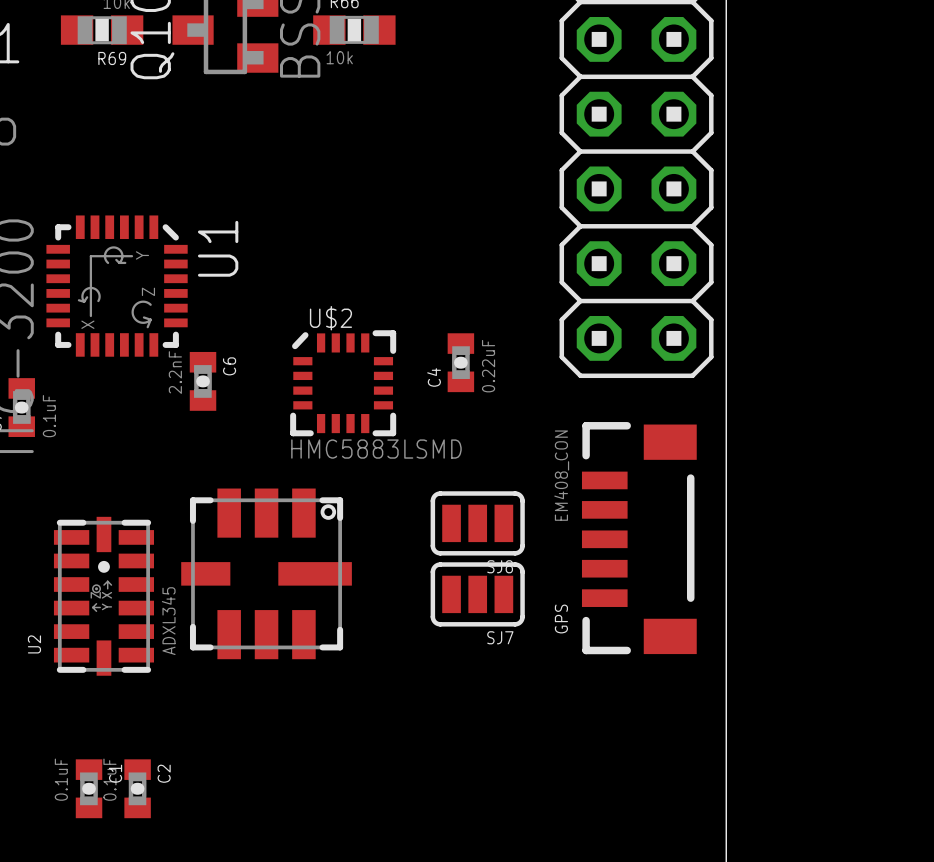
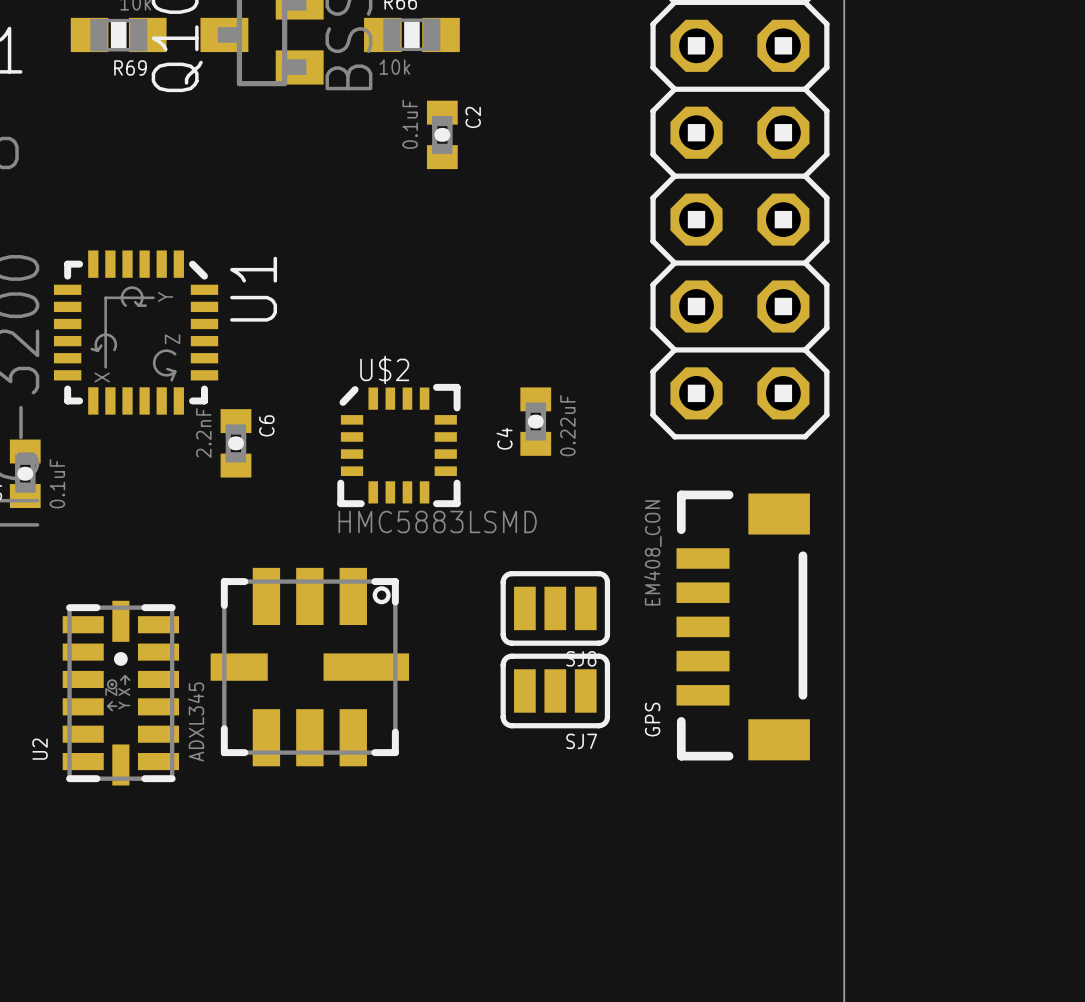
C1: 0.1uF (89, 788) -> none
C2 position: (137, 788) -> (442, 134)

